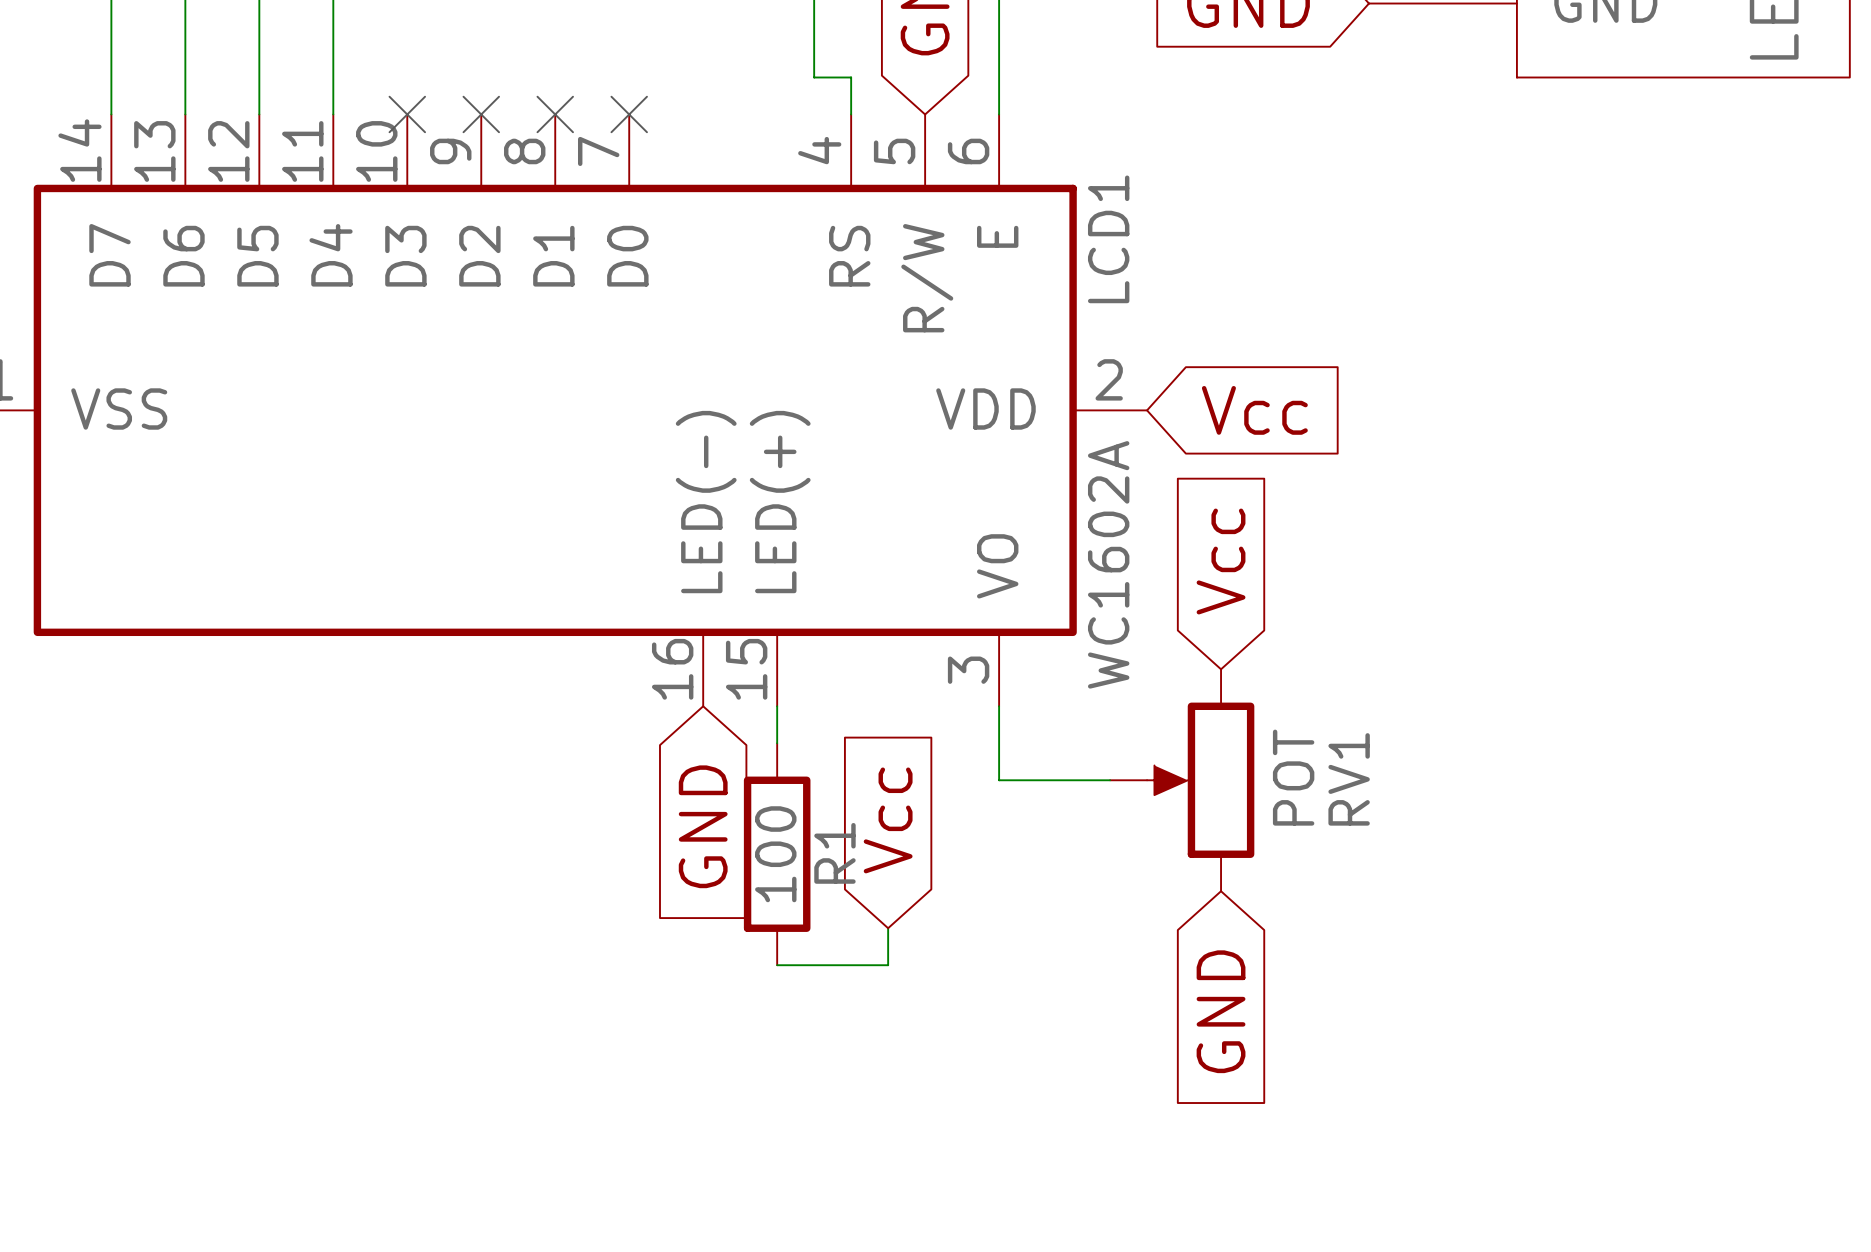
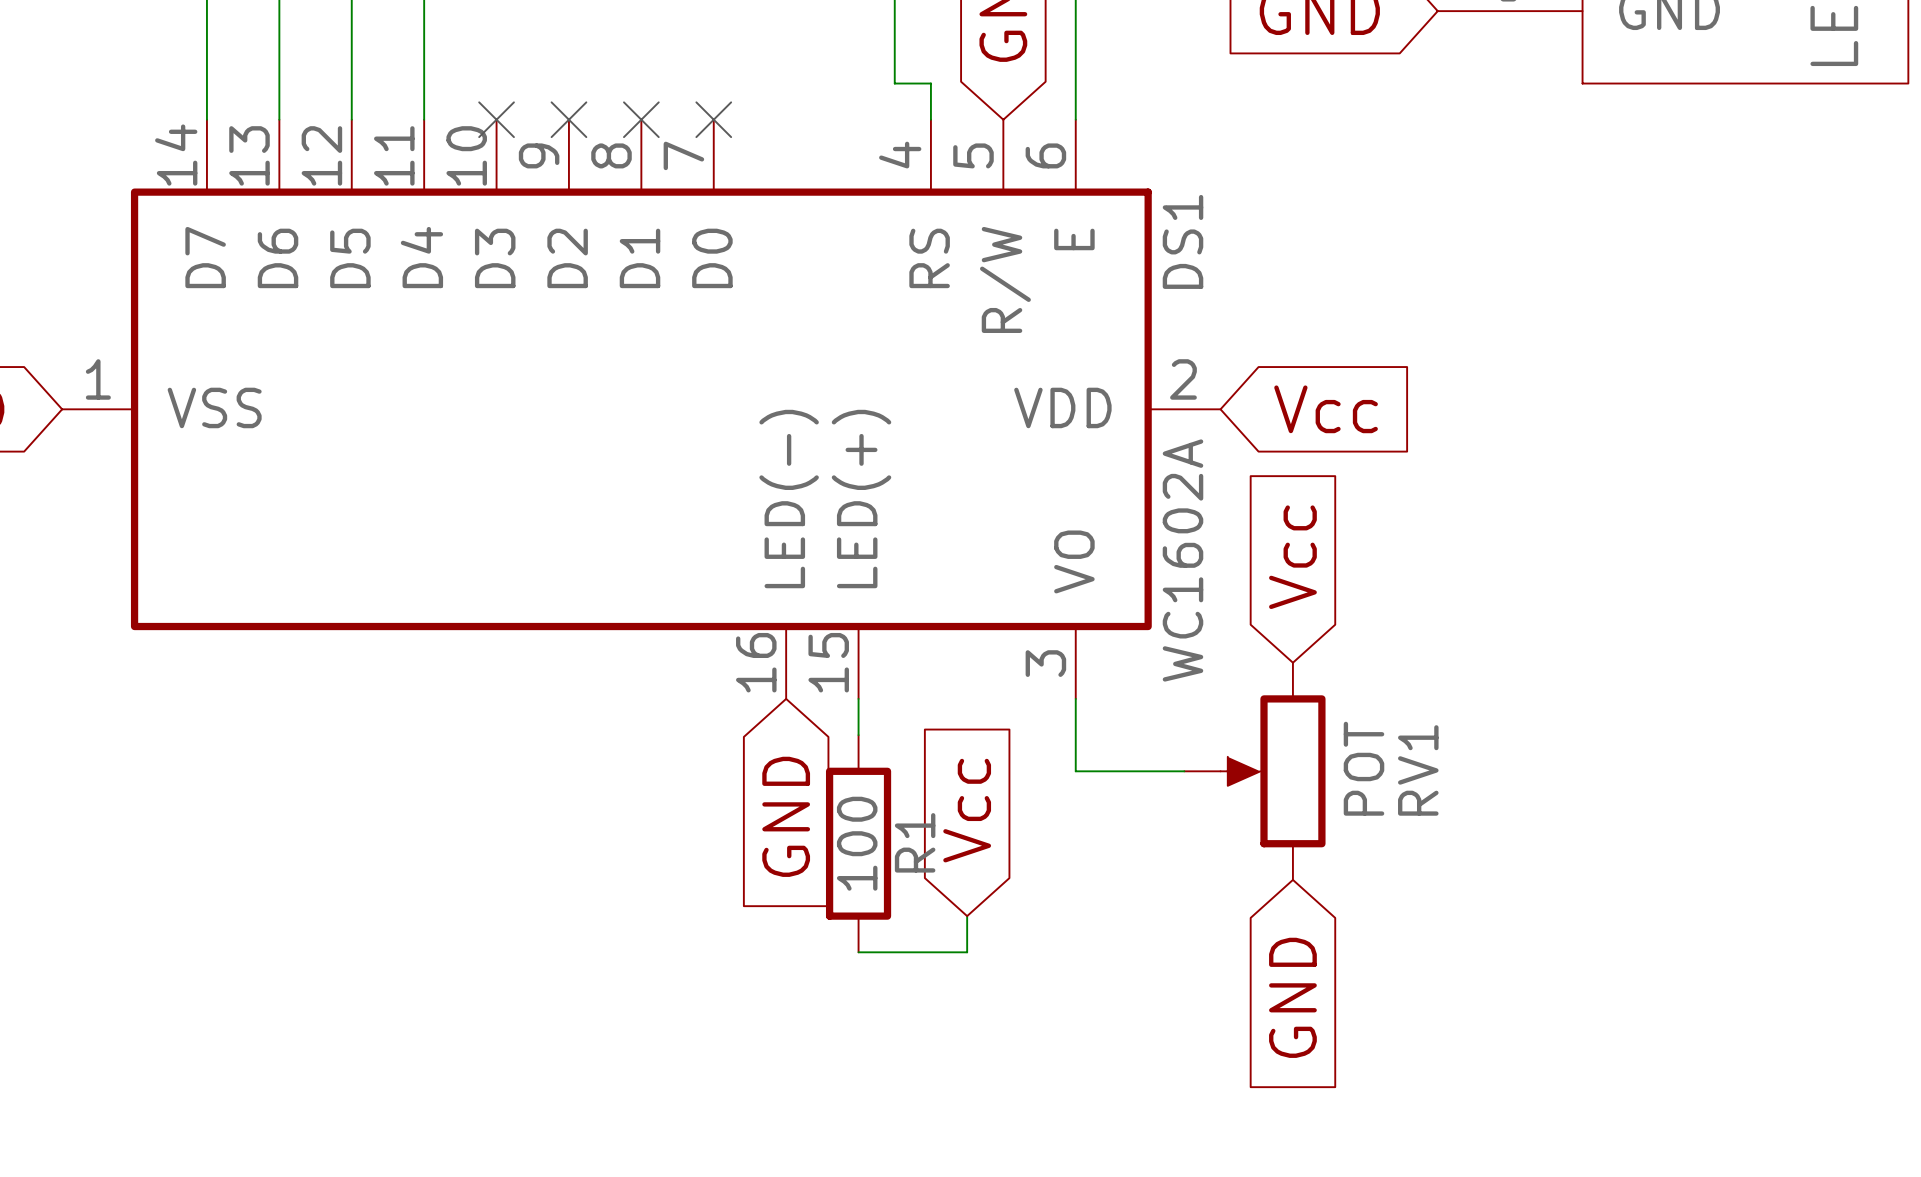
LCD1 name: LCD1 (1108, 239) -> DS1 (1183, 241)

